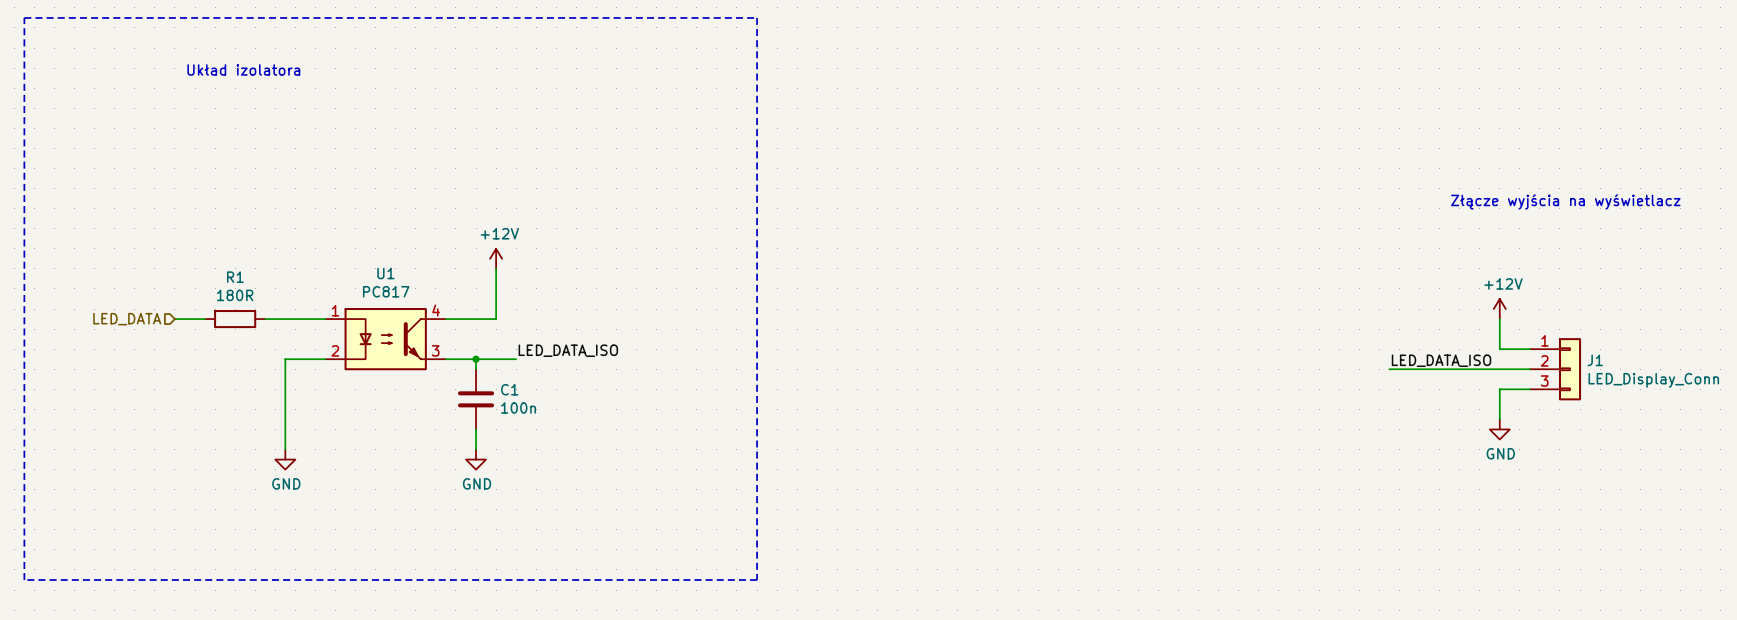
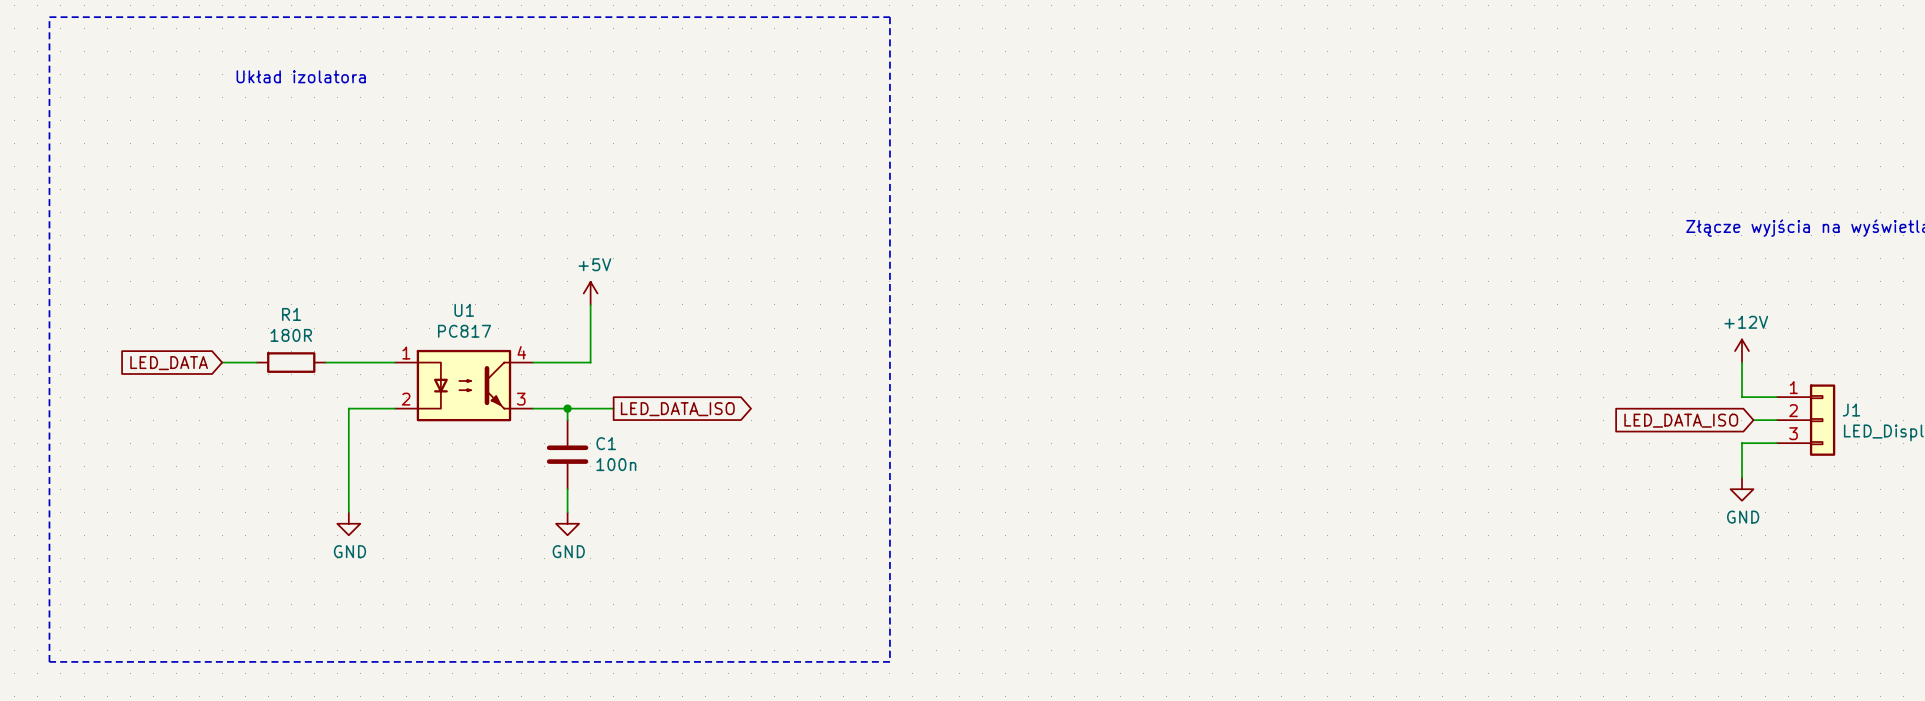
power symbol: +12V (496, 258) -> +5V (590, 293)
hierarchical label: LED_DATA (127, 319) -> none
global label: none -> LED_DATA (169, 363)
label: LED_DATA_ISO (568, 350) -> none
global label: none -> LED_DATA_ISO (677, 409)
label: LED_DATA_ISO (1441, 360) -> none
wire: (1389, 369) (1509, 369) -> none
global label: none -> LED_DATA_ISO (1681, 420)

